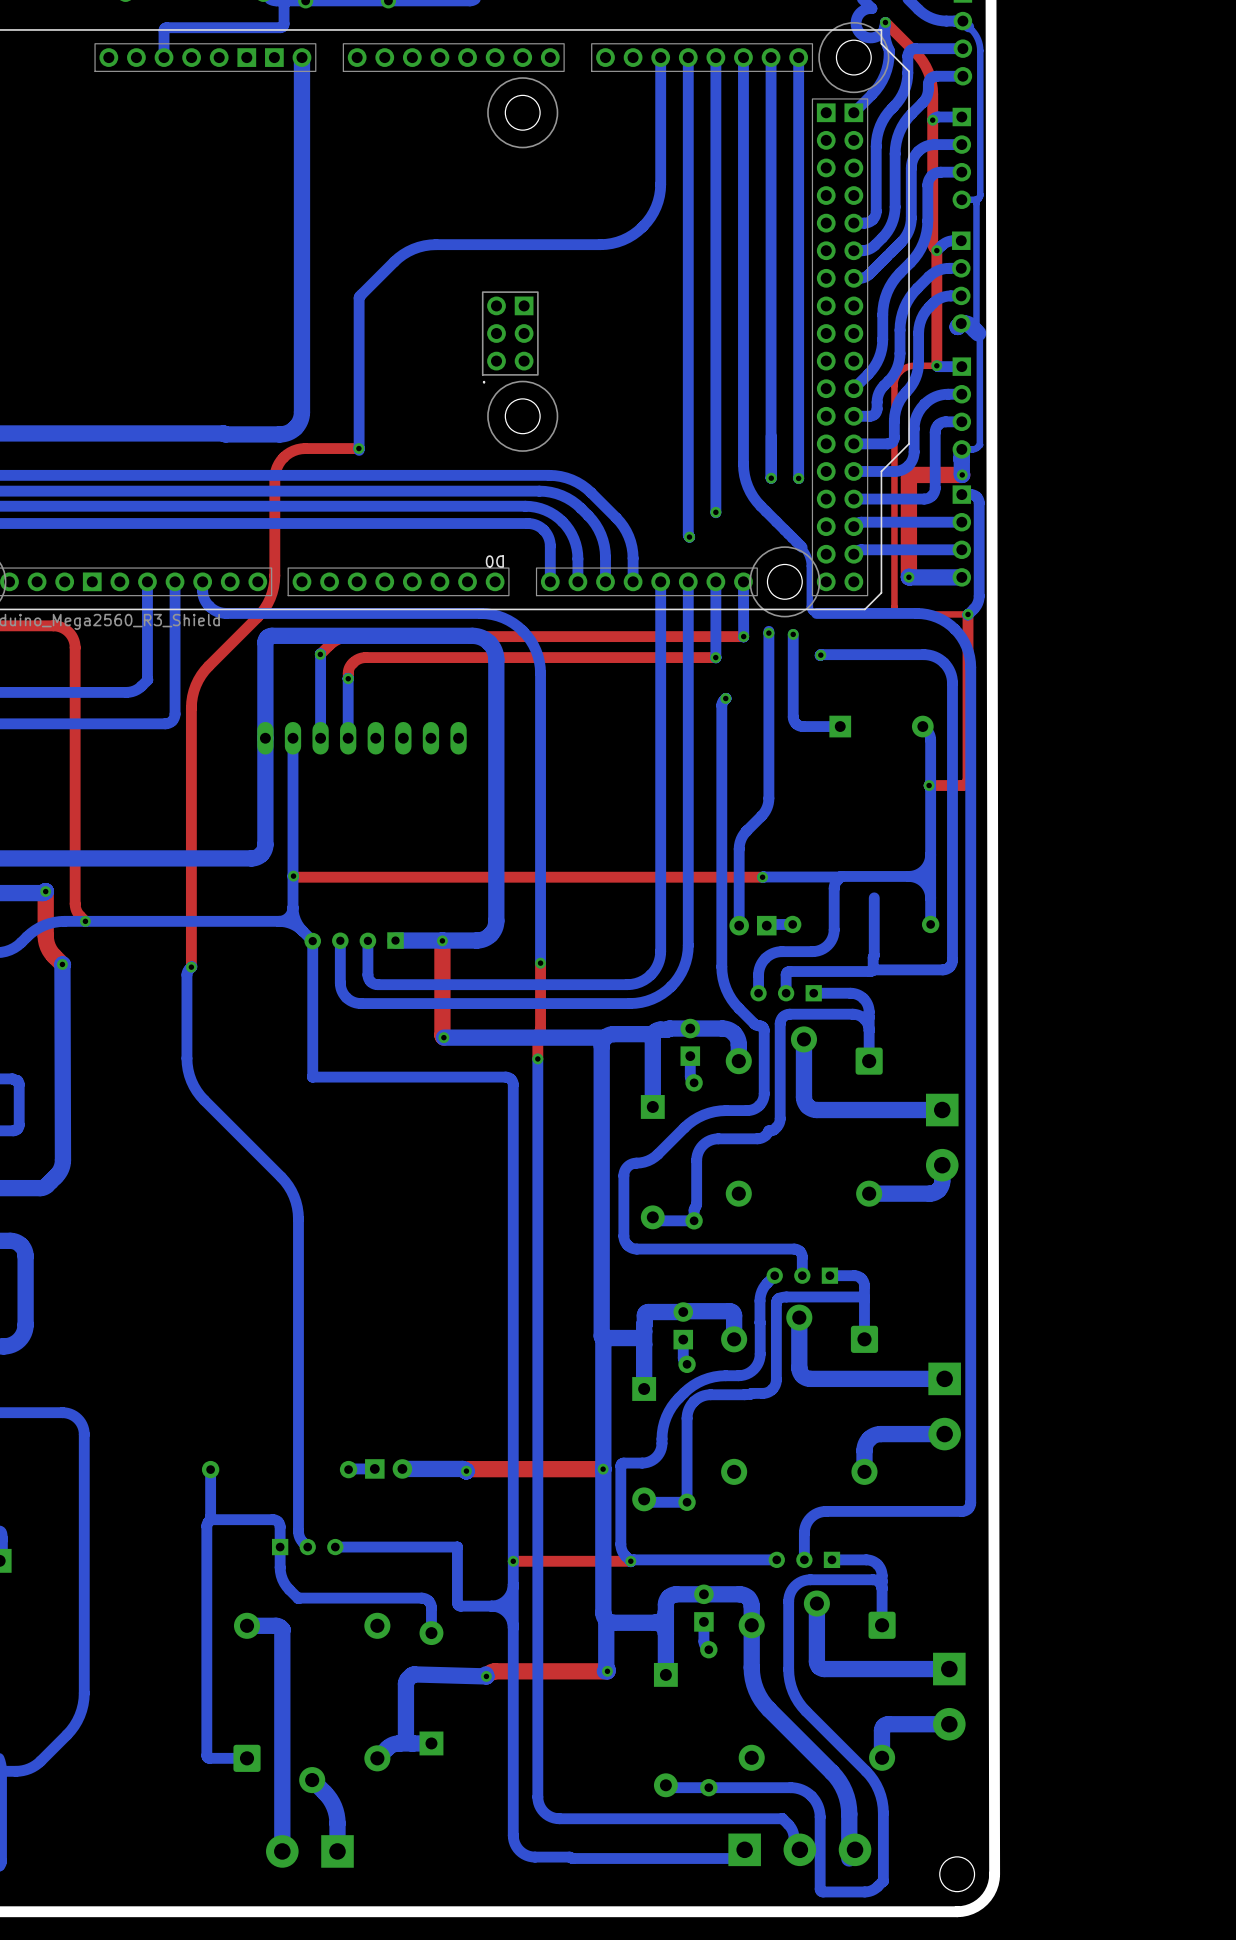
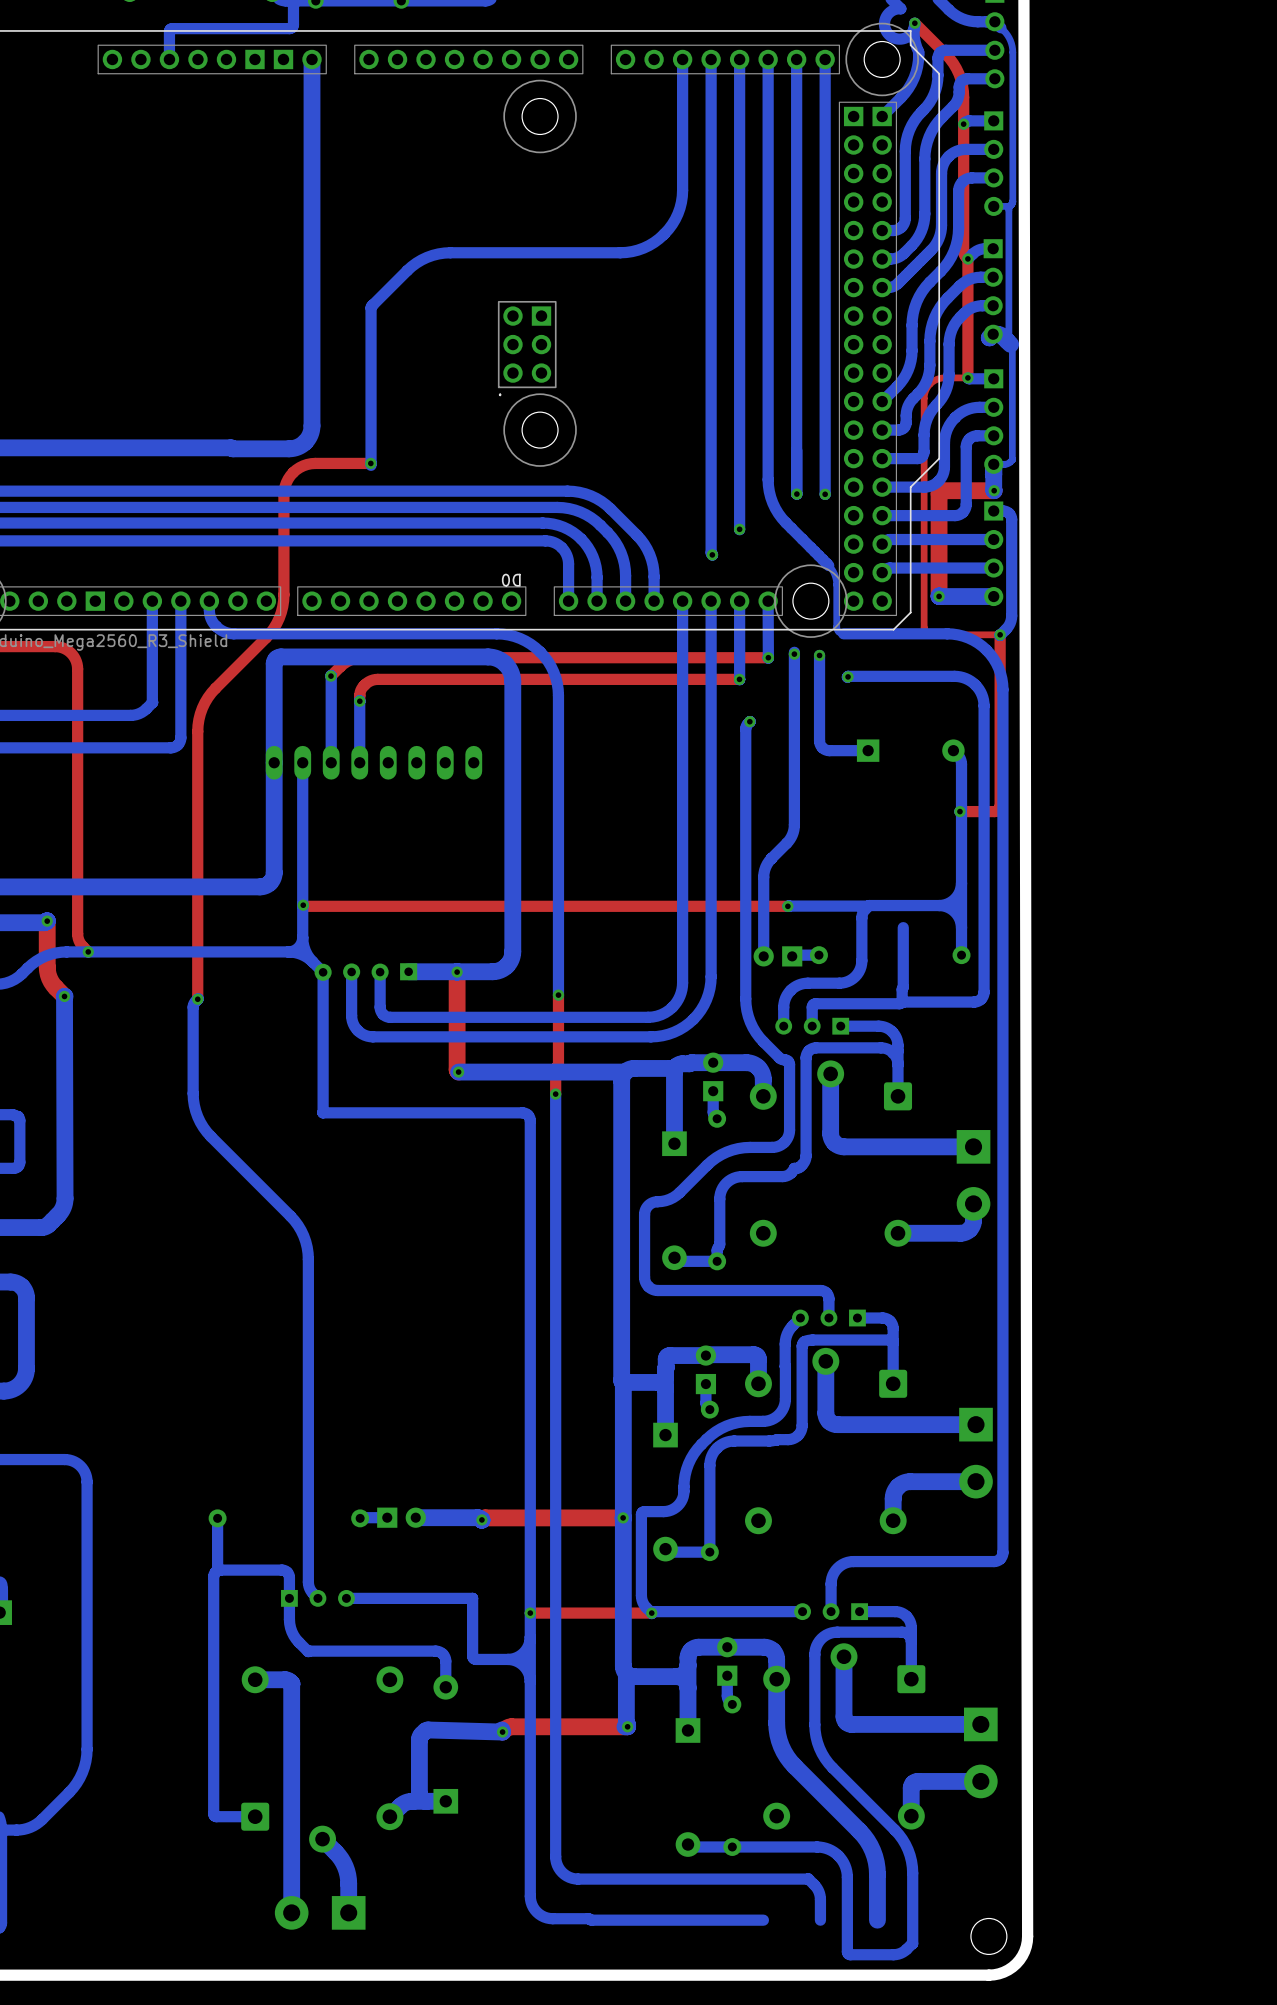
part: (799, 1849) -> none

